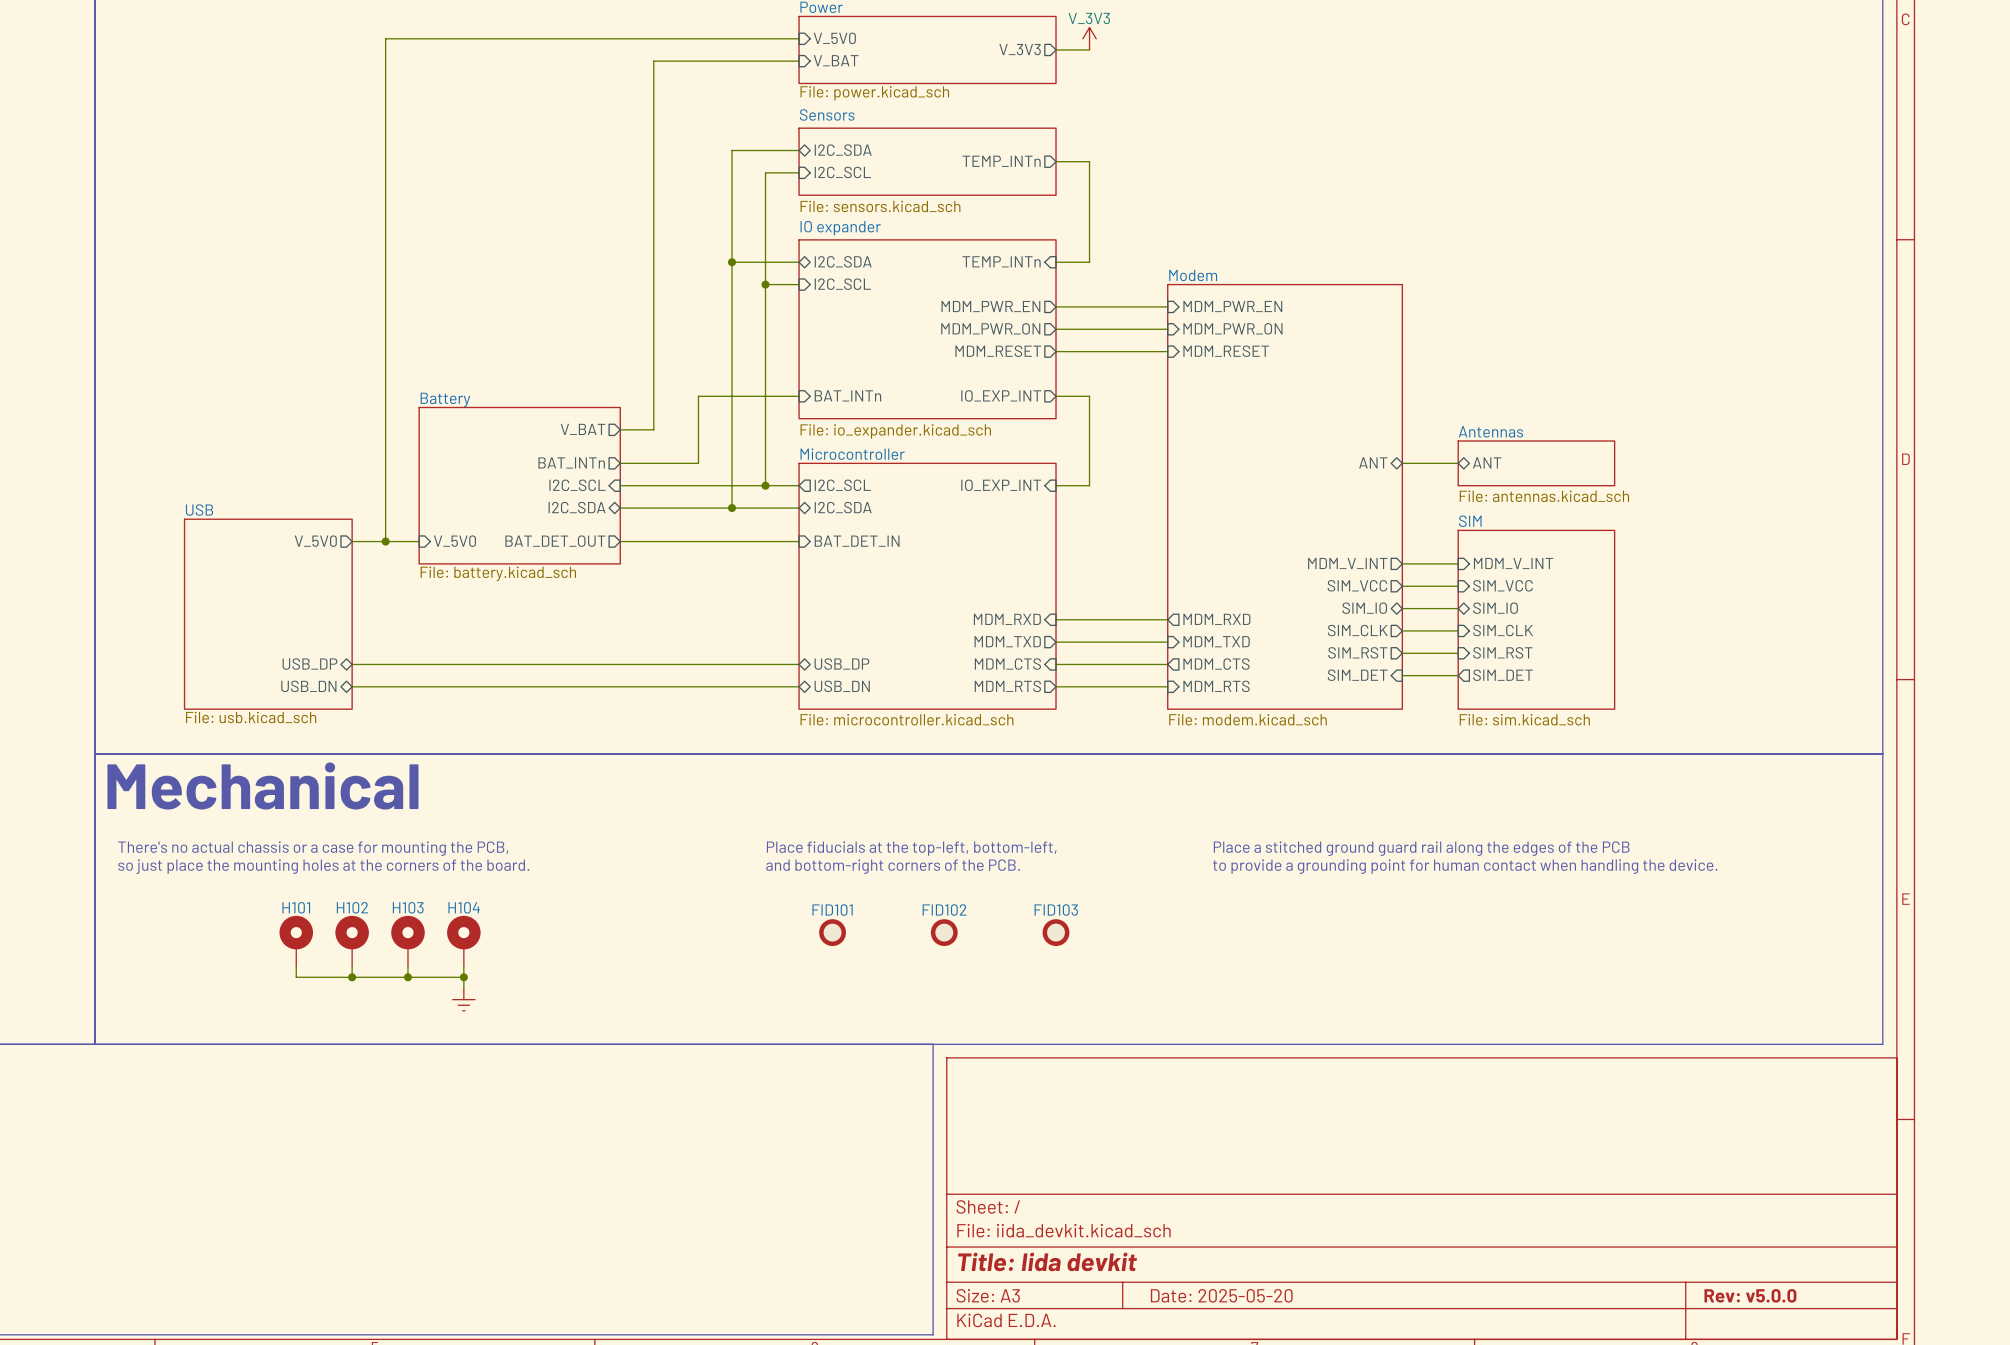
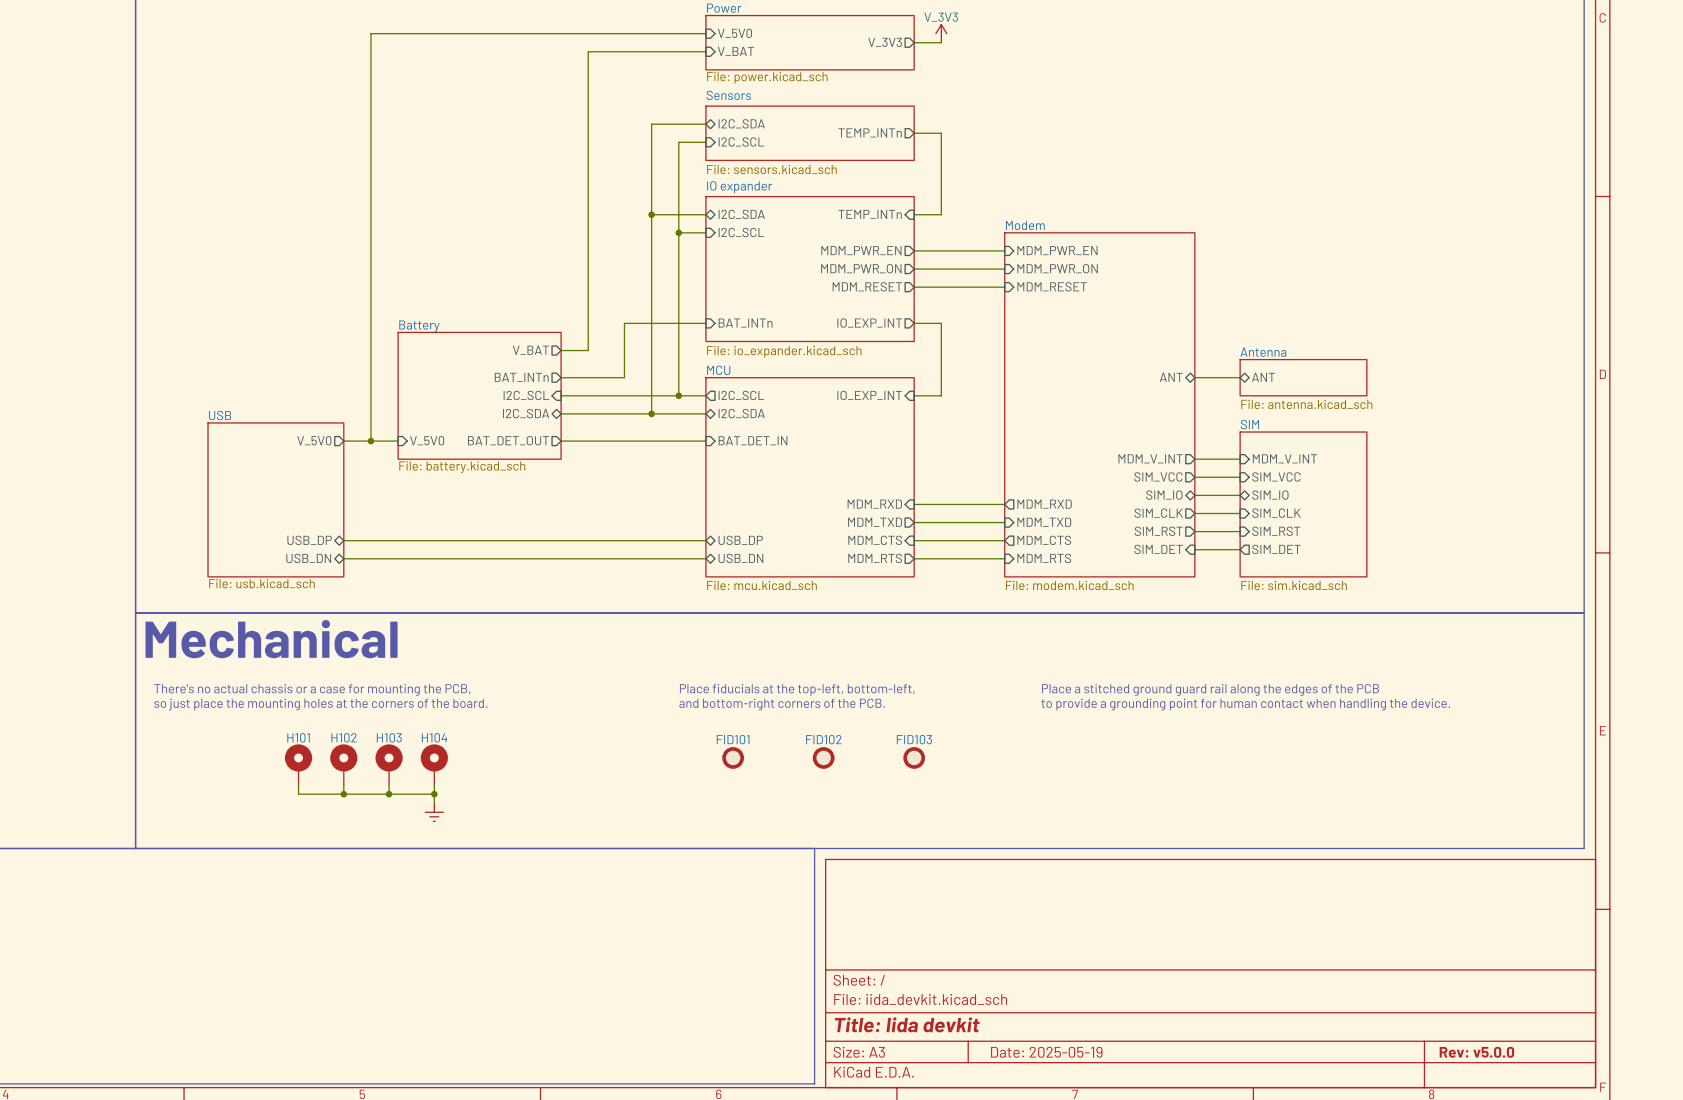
sheet Antennas name: Antennas (1490, 431) -> Antenna (1263, 352)
sheet Microcontroller name: Microcontroller (852, 454) -> MCU (718, 370)
sheet Antennas value: File: antennas.kicad_sch (1544, 496) -> File: antenna.kicad_sch (1306, 404)
sheet Microcontroller value: File: microcontroller.kicad_sch (906, 719) -> File: mcu.kicad_sch (761, 585)
title block: Date: 2025-05-20 (1221, 1295) -> Date: 2025-05-19 (1046, 1052)

